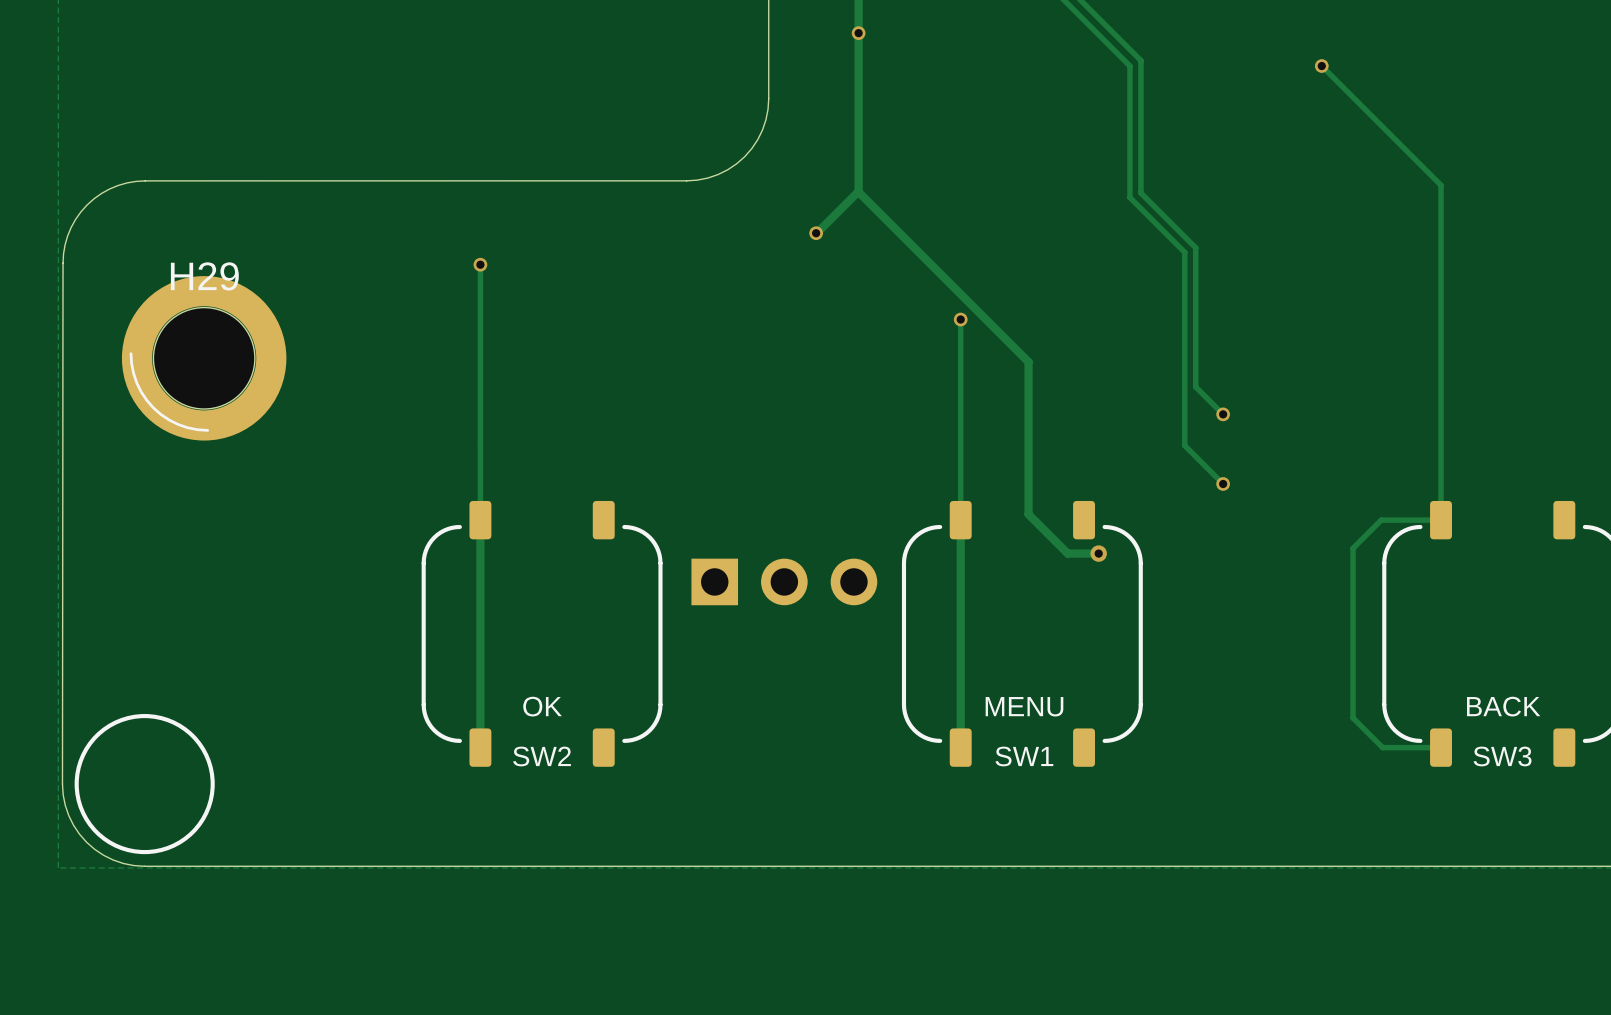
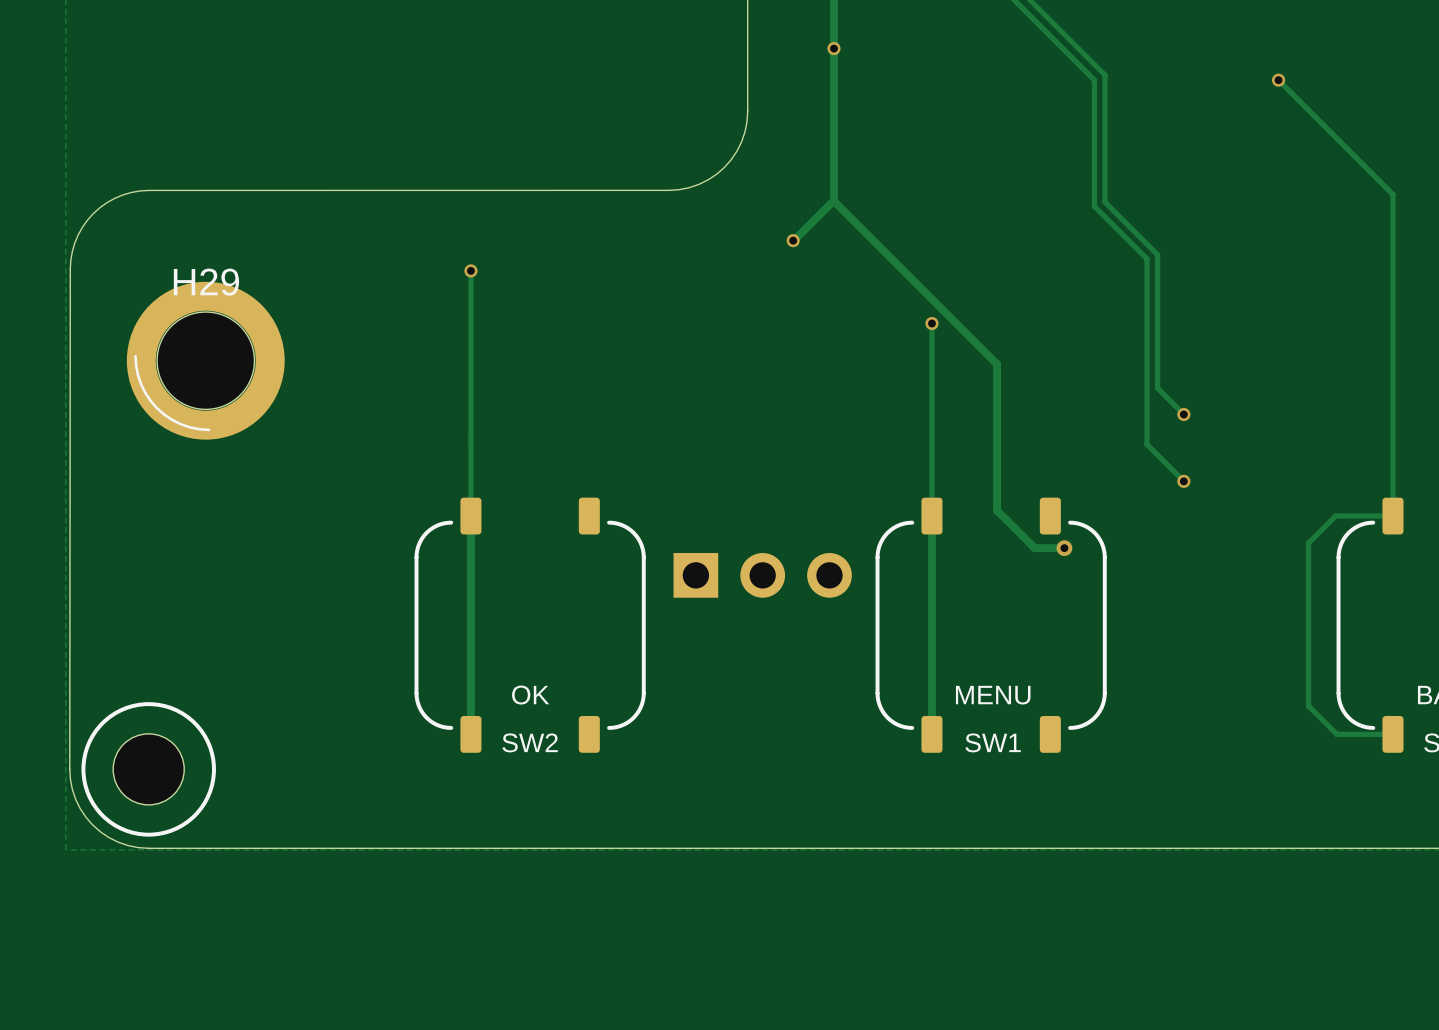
part: none -> (148, 769)

